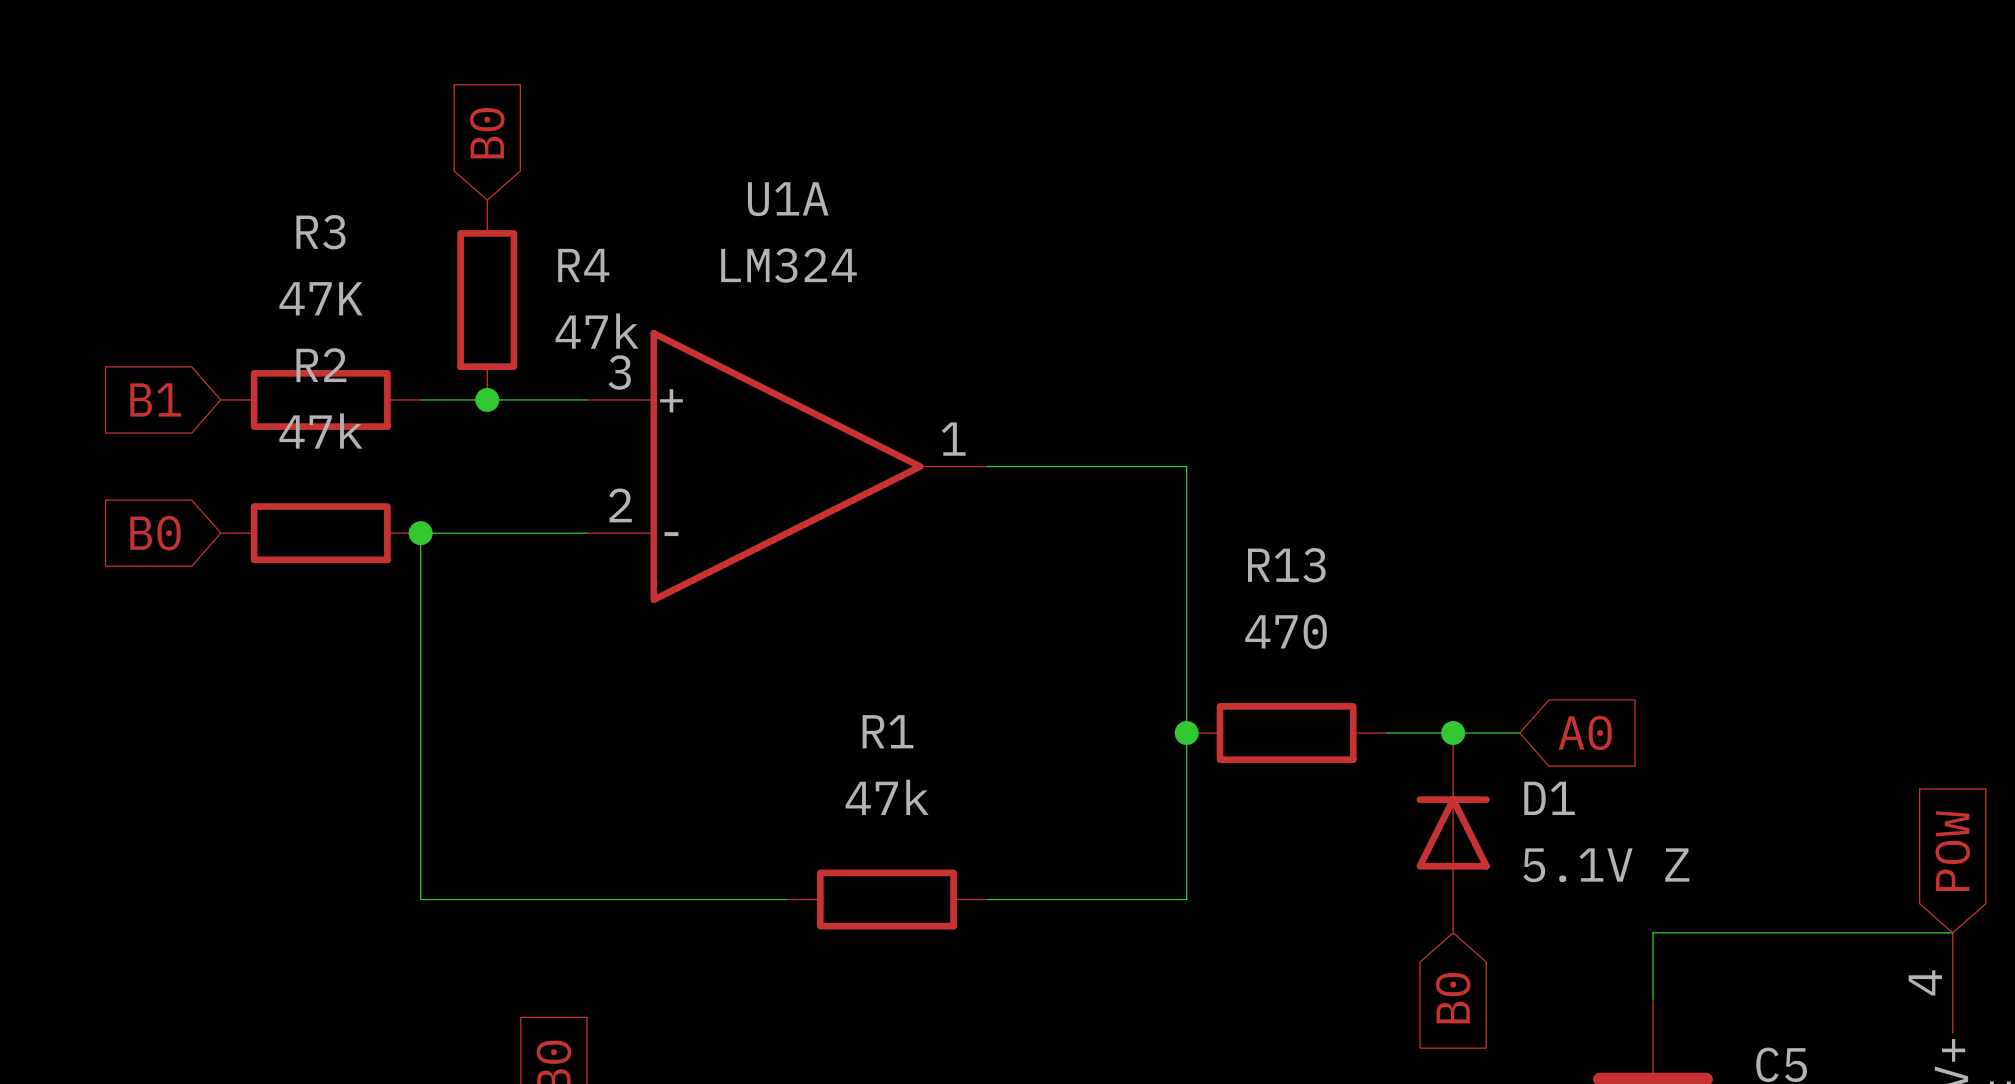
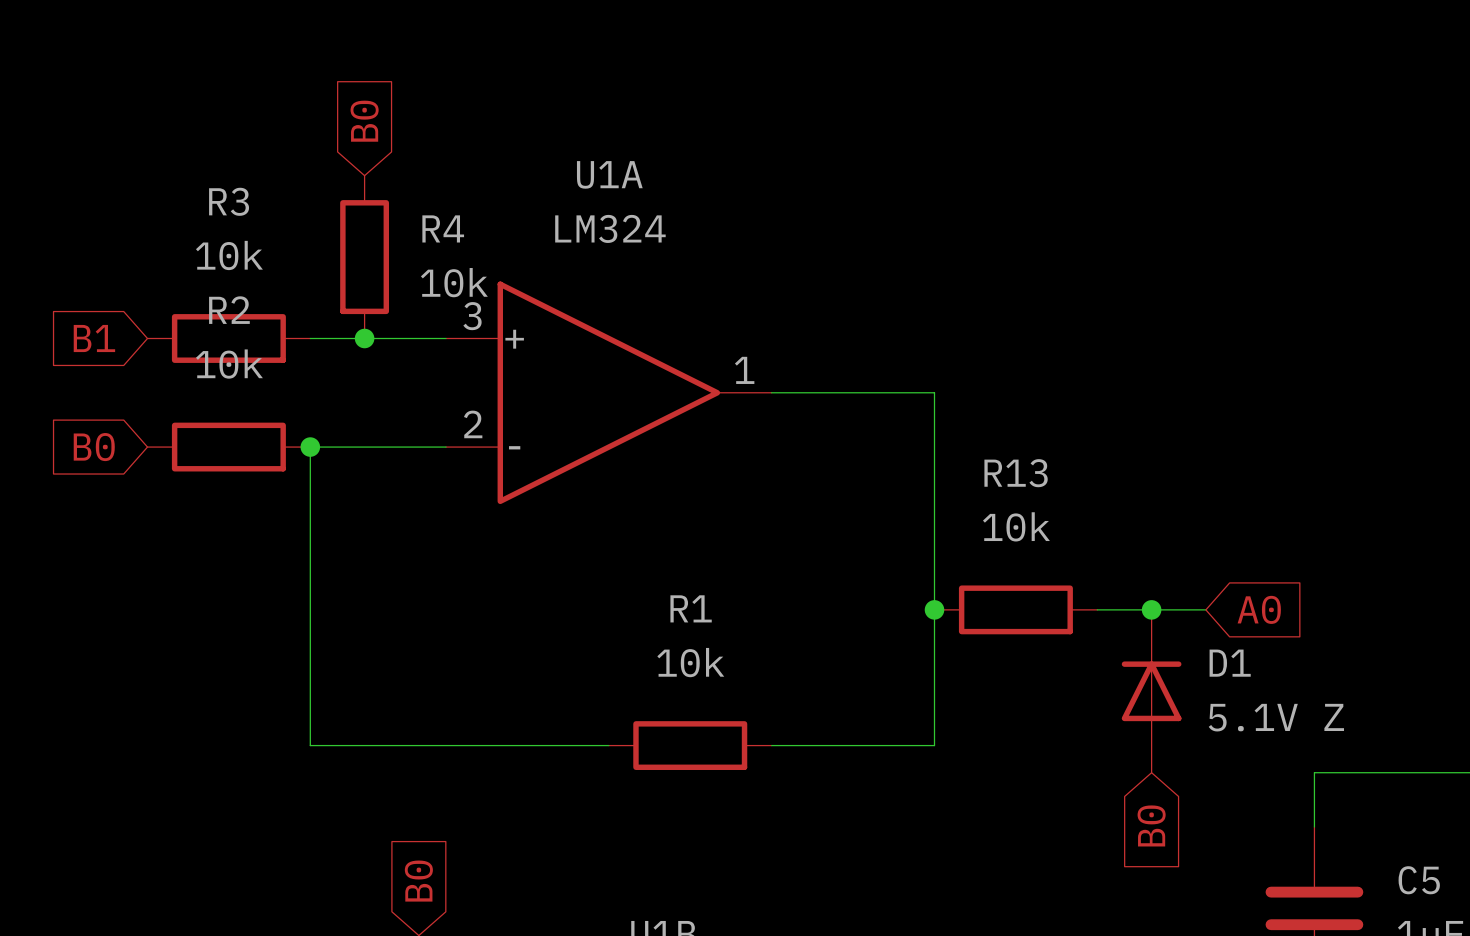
R3 value: 47K (321, 298) -> 10k (229, 255)
R4 value: 47k (597, 331) -> 10k (454, 282)
R2 value: 47k (320, 431) -> 10k (229, 364)
R13 value: 470 (1286, 631) -> 10k (1016, 526)
R1 value: 47k (887, 797) -> 10k (690, 662)

